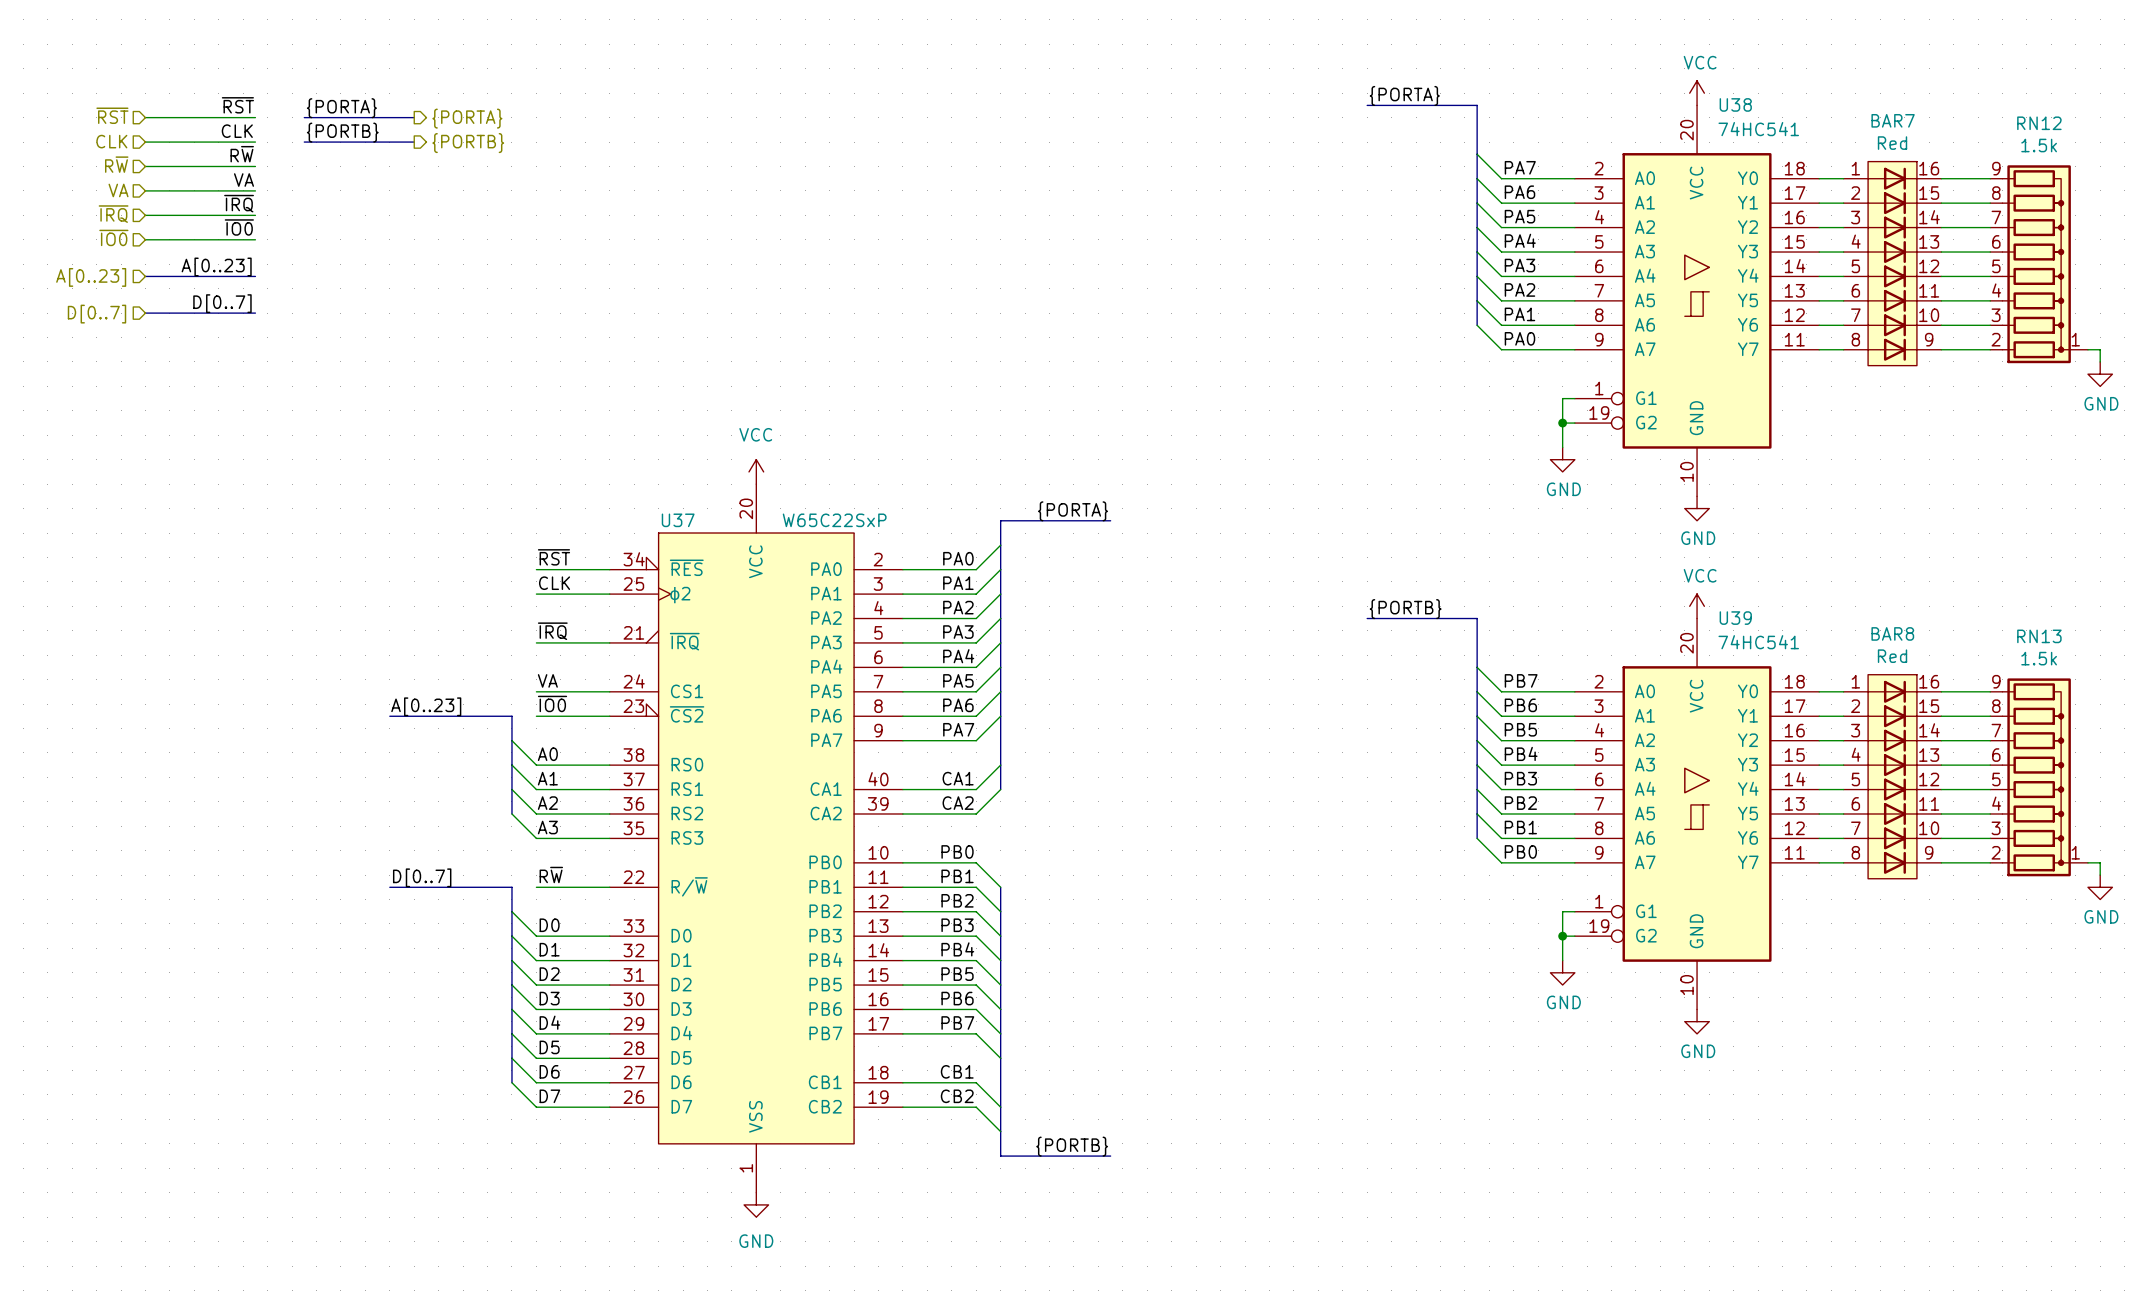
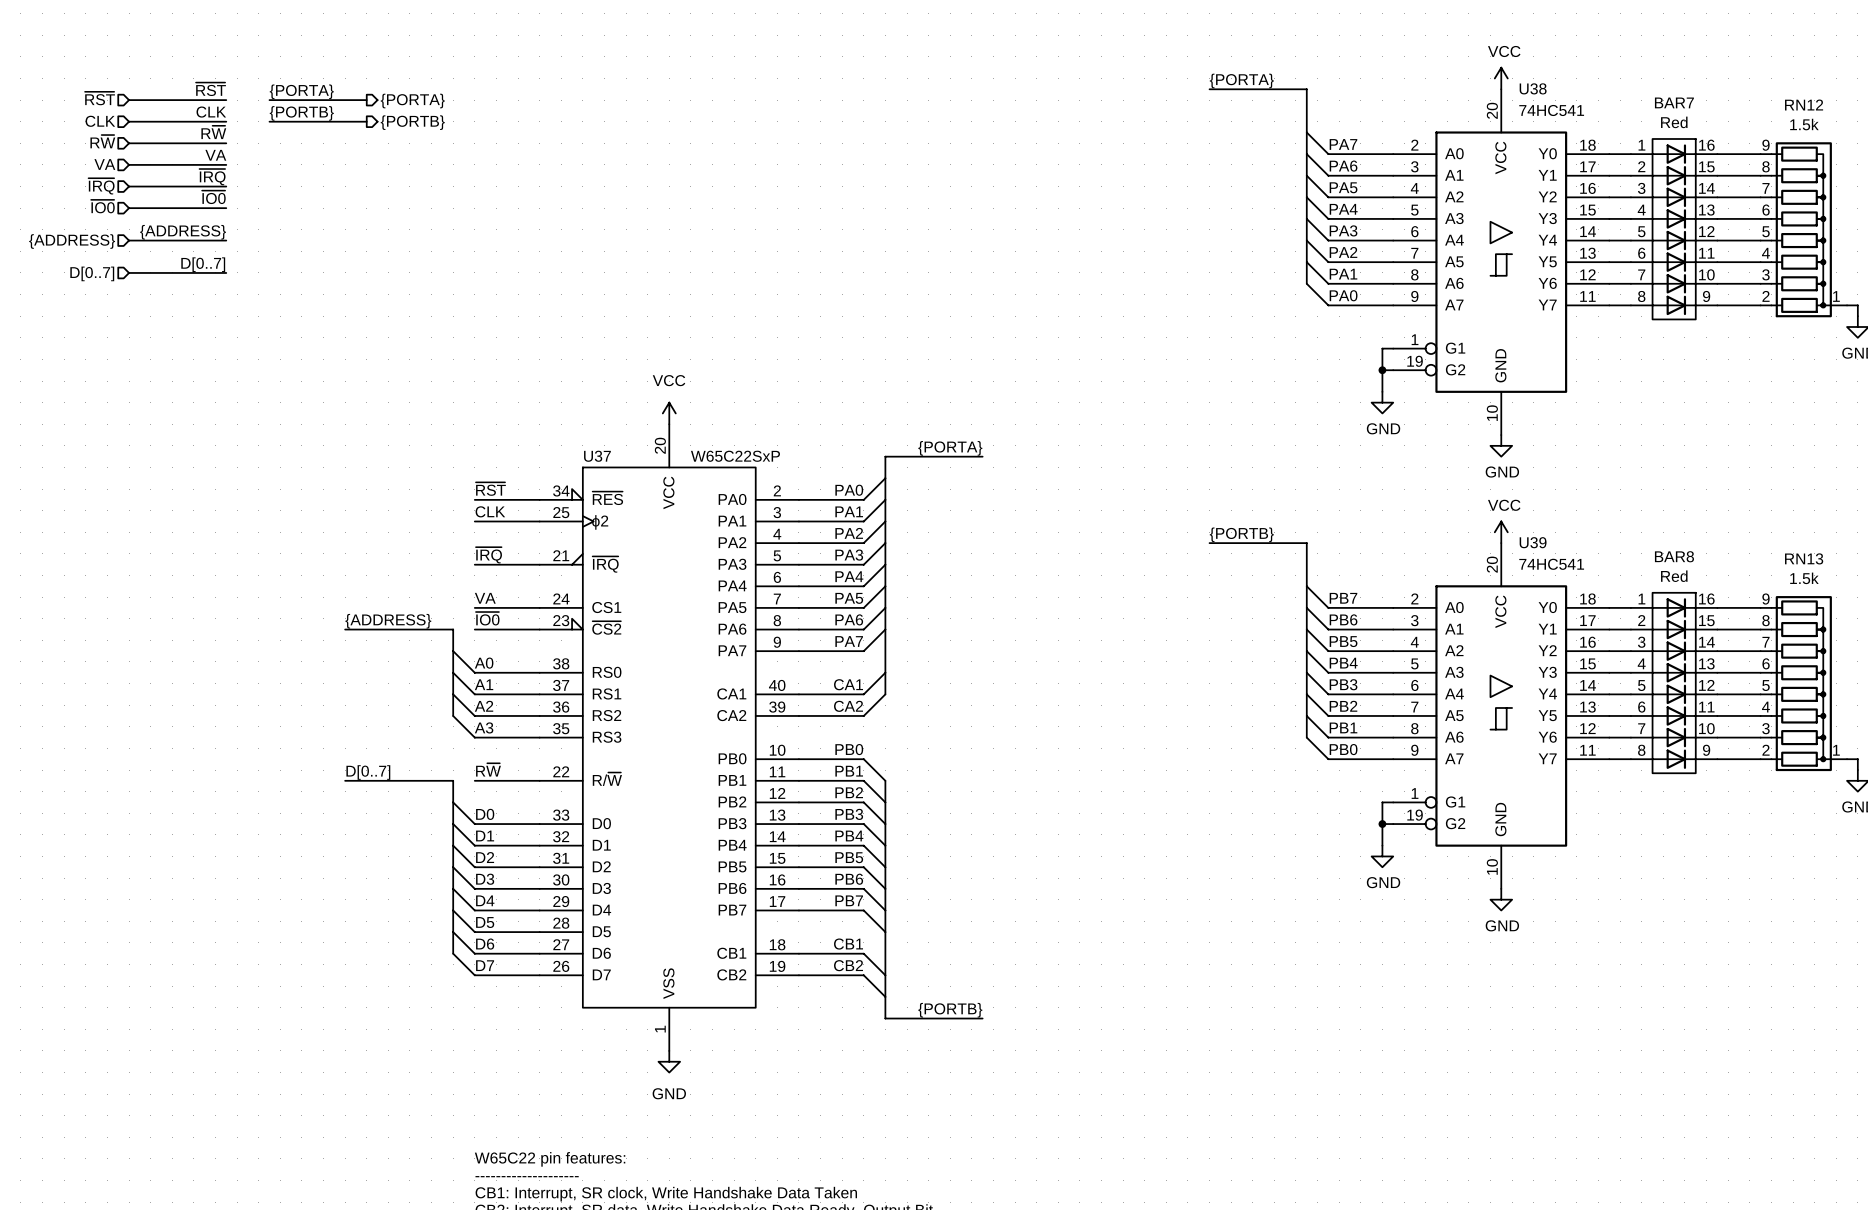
label: A[0..23] (216, 266) -> {ADDRESS} (183, 232)
hierarchical label: A[0..23] (91, 277) -> {ADDRESS} (72, 241)
label: A[0..23] (426, 706) -> {ADDRESS} (388, 621)

